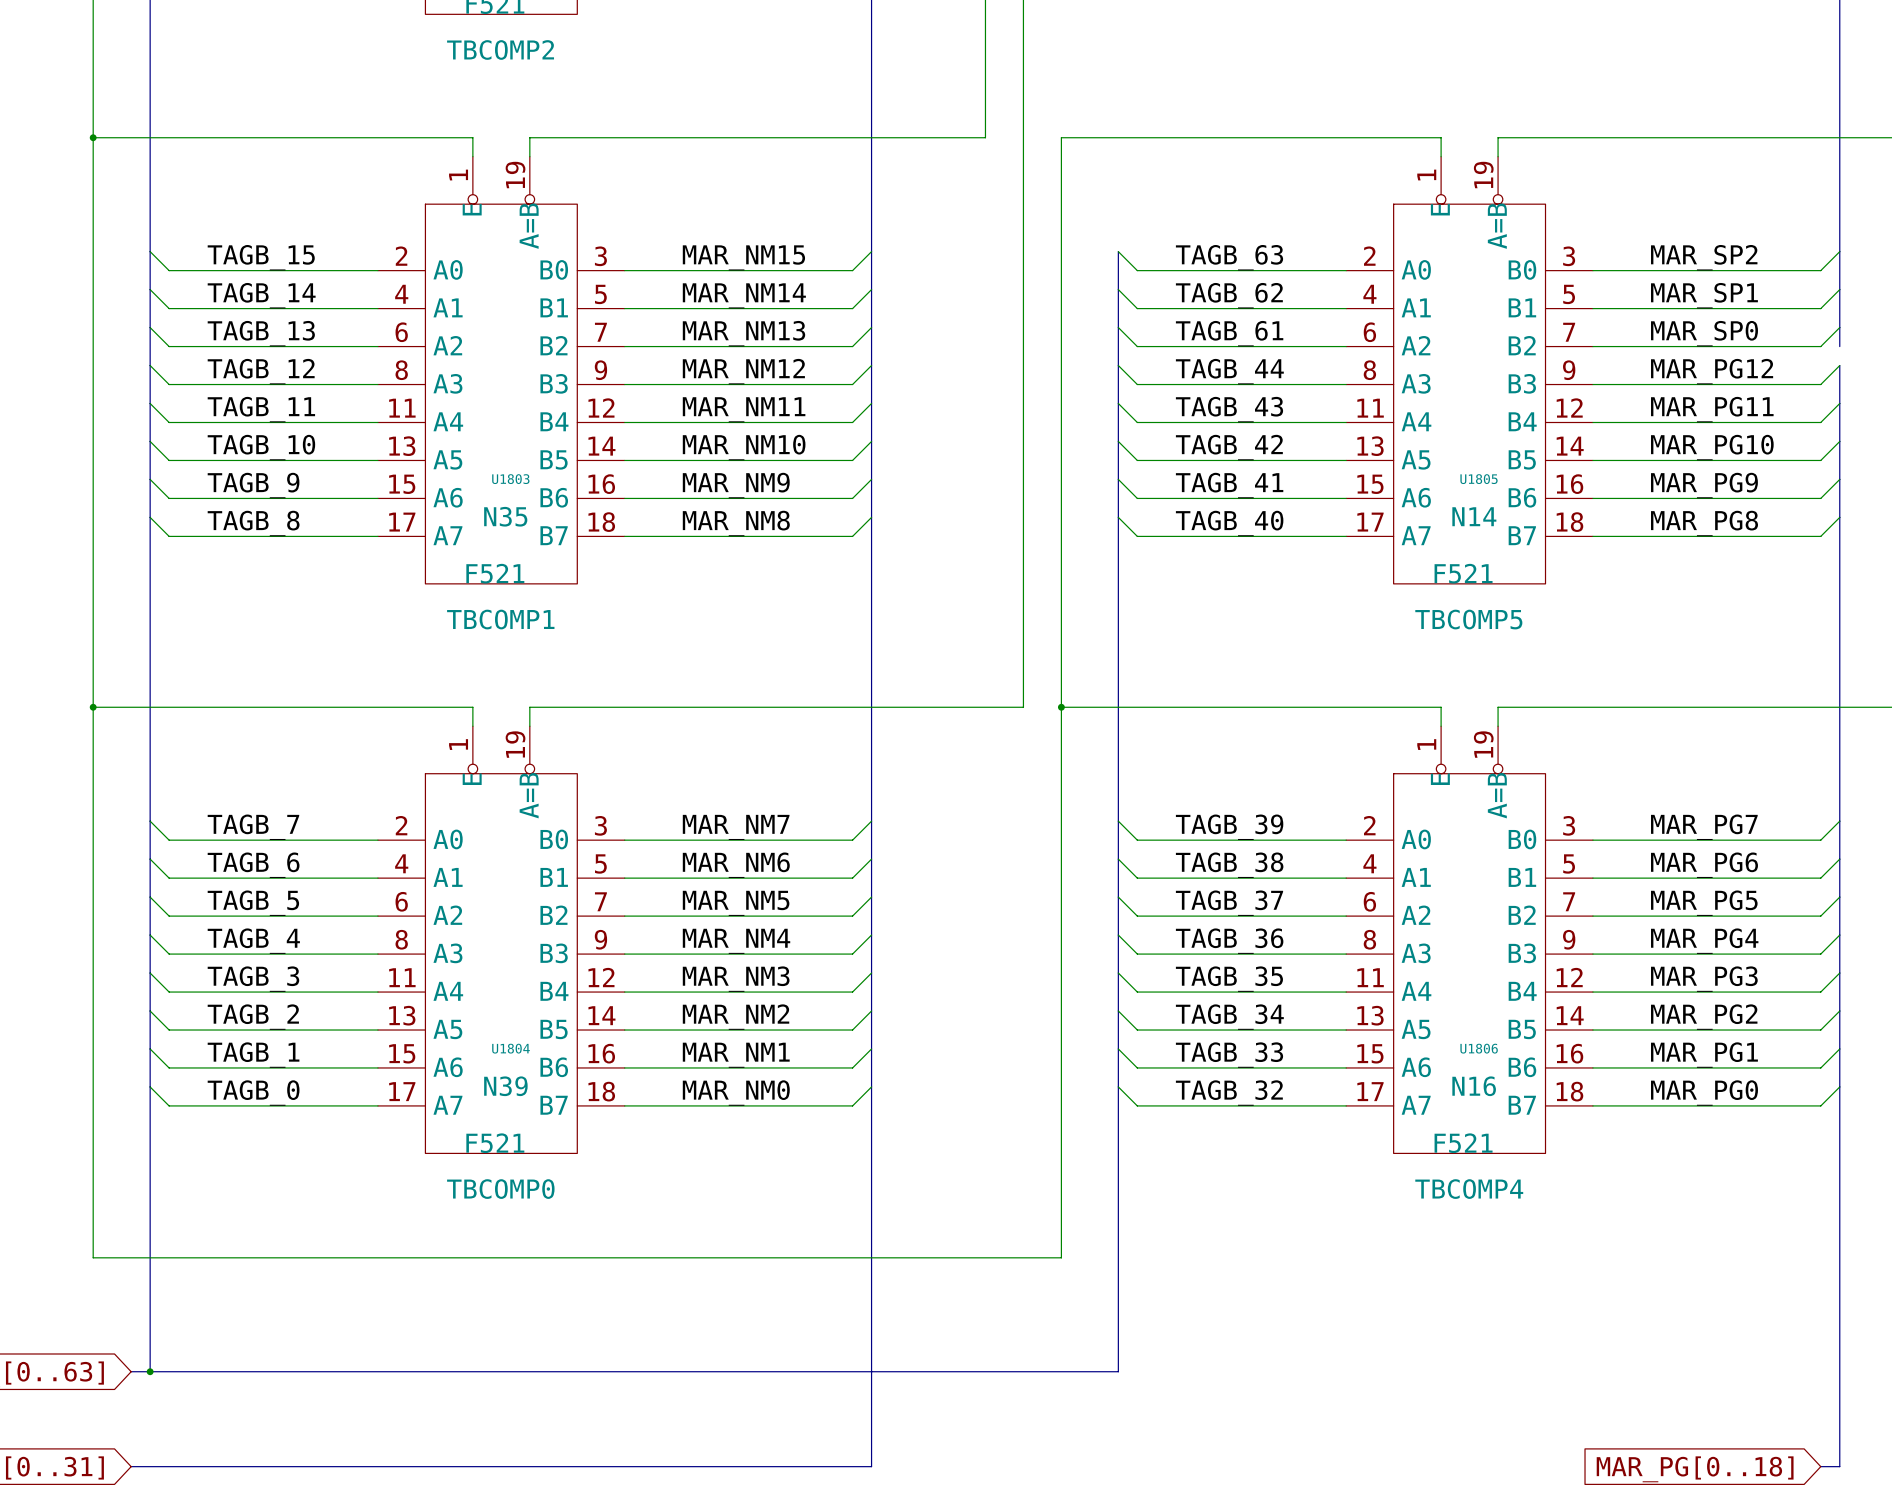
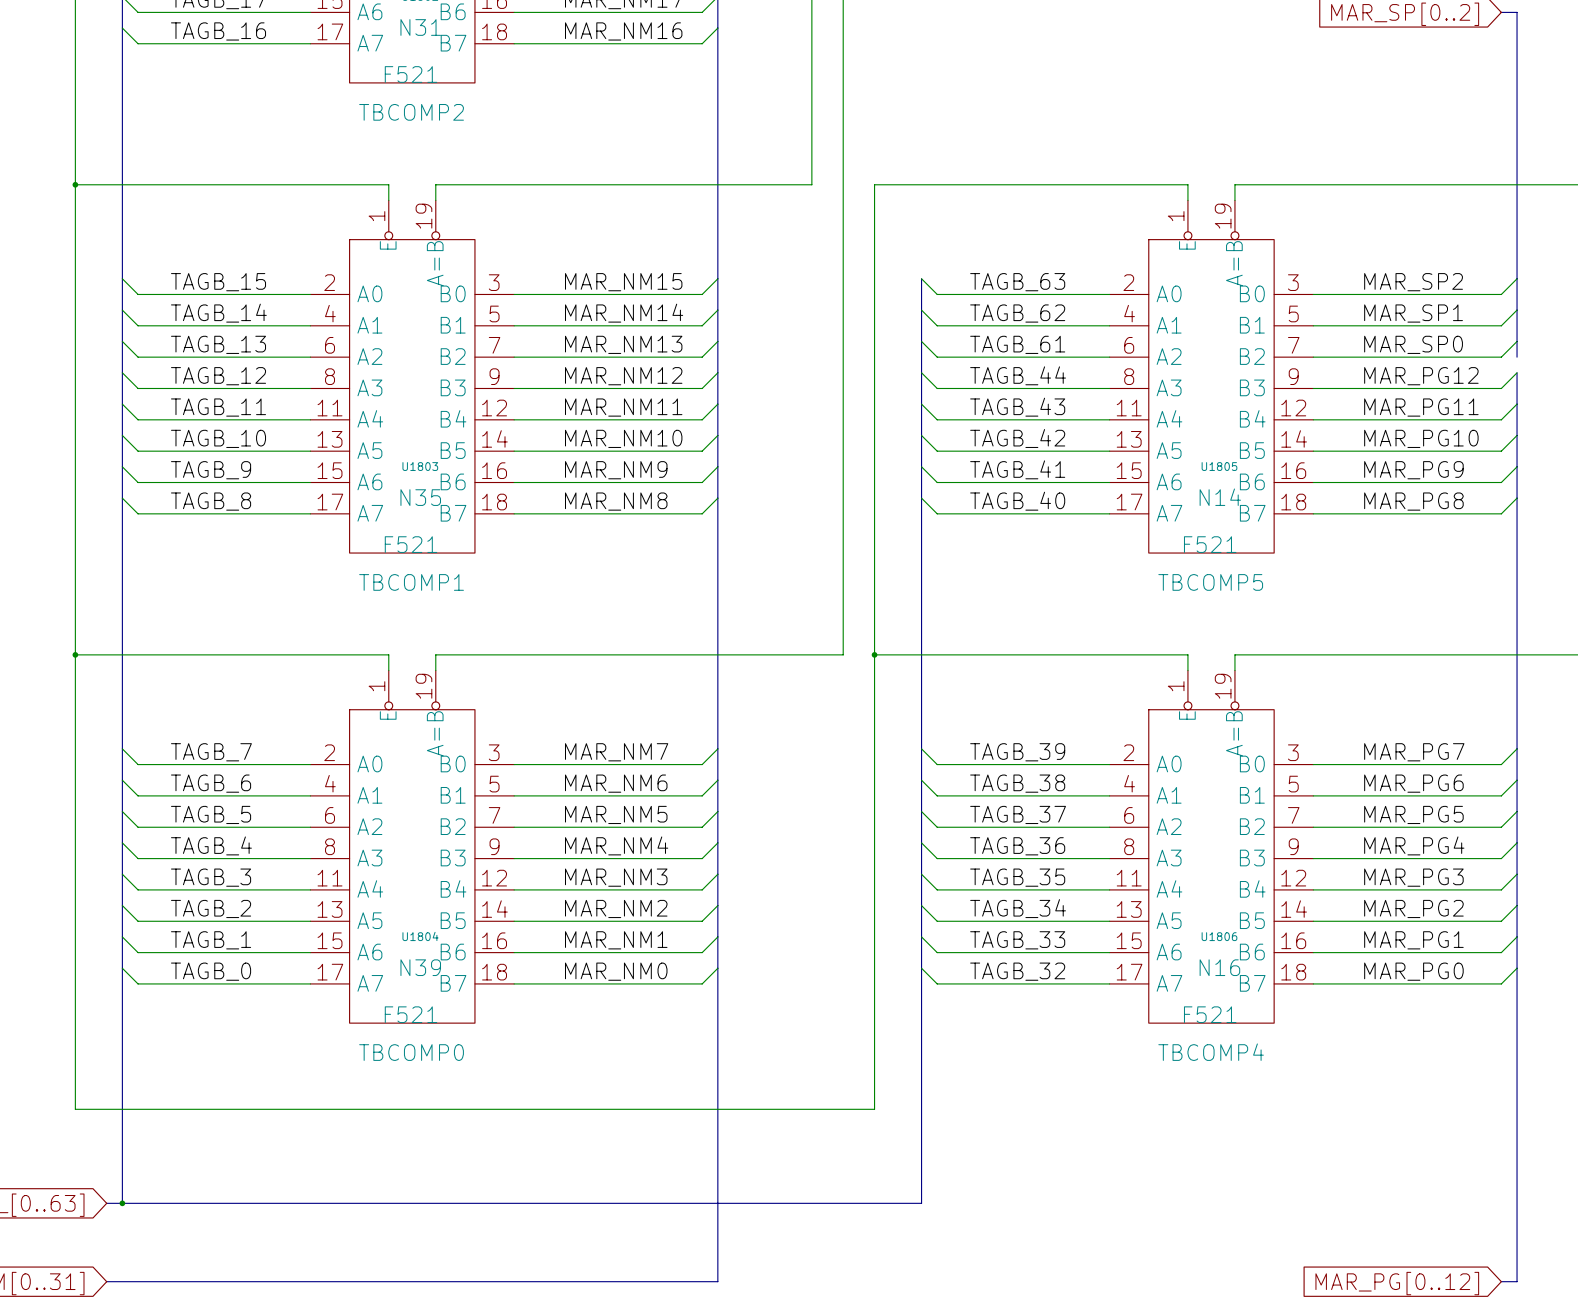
global label: MAR_PG[0..18] (1695, 1469) -> MAR_PG[0..12] (1397, 1283)

